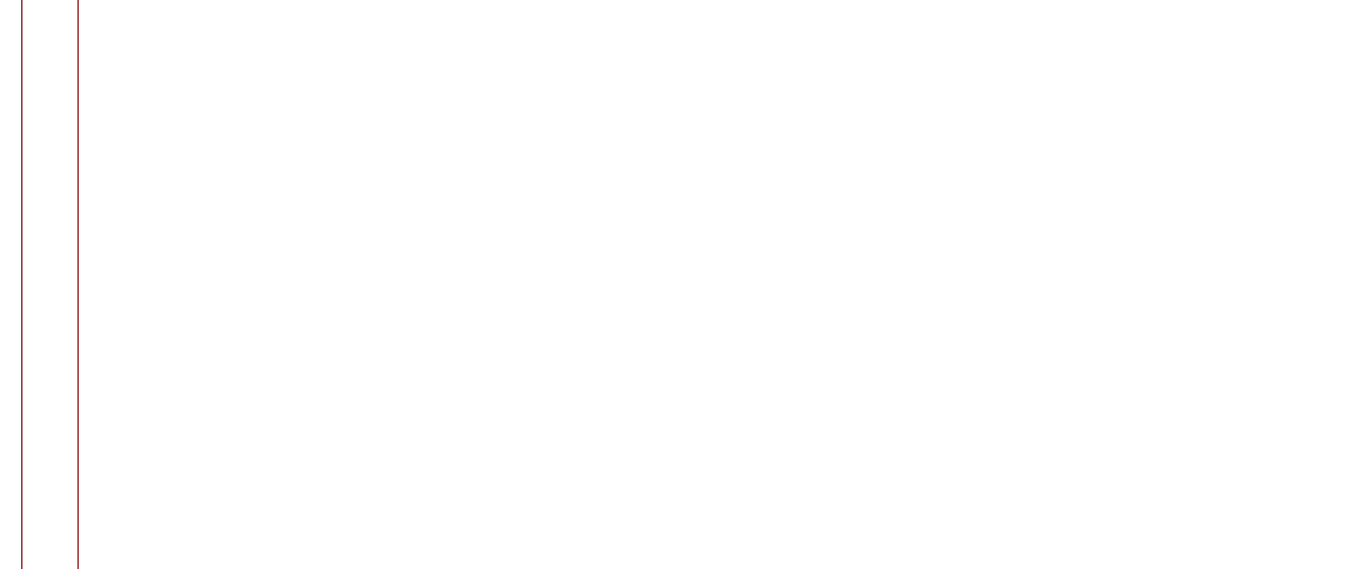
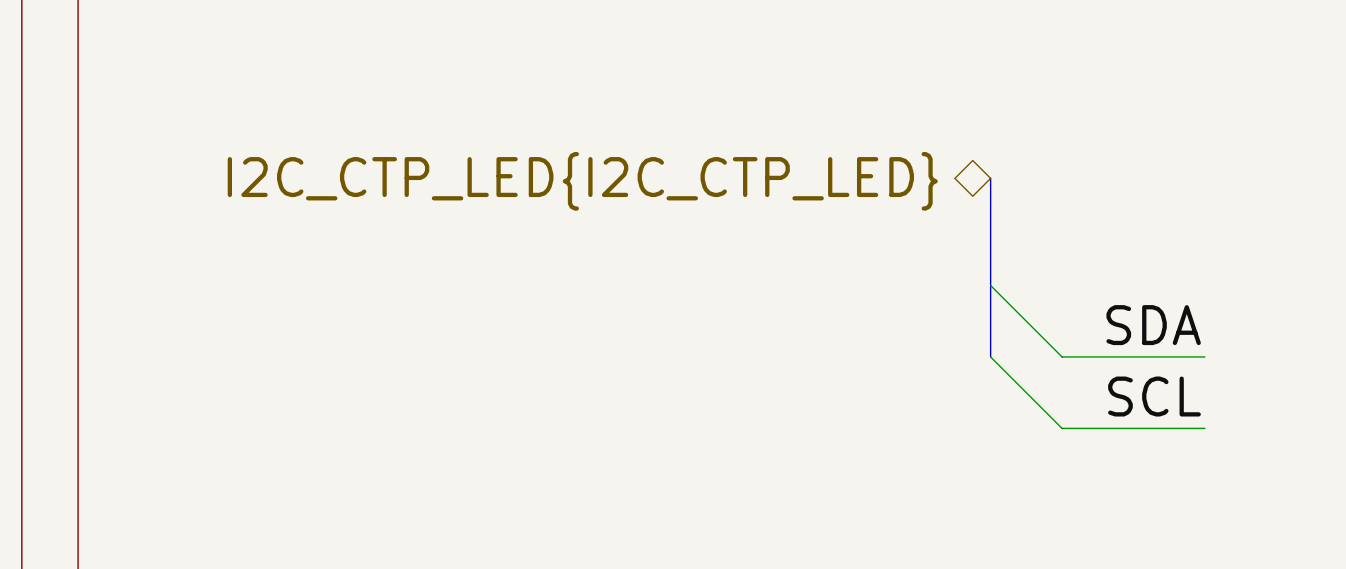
bus: none -> (990, 178) (990, 356)
hierarchical label: none -> I2C_CTP_LED{I2C_CTP_LED} (582, 181)
wire: none -> (990, 285) (1062, 356) (1204, 356)
label: none -> SDA (1153, 325)
wire: none -> (990, 356) (1062, 428) (1204, 428)
label: none -> SCL (1154, 396)

